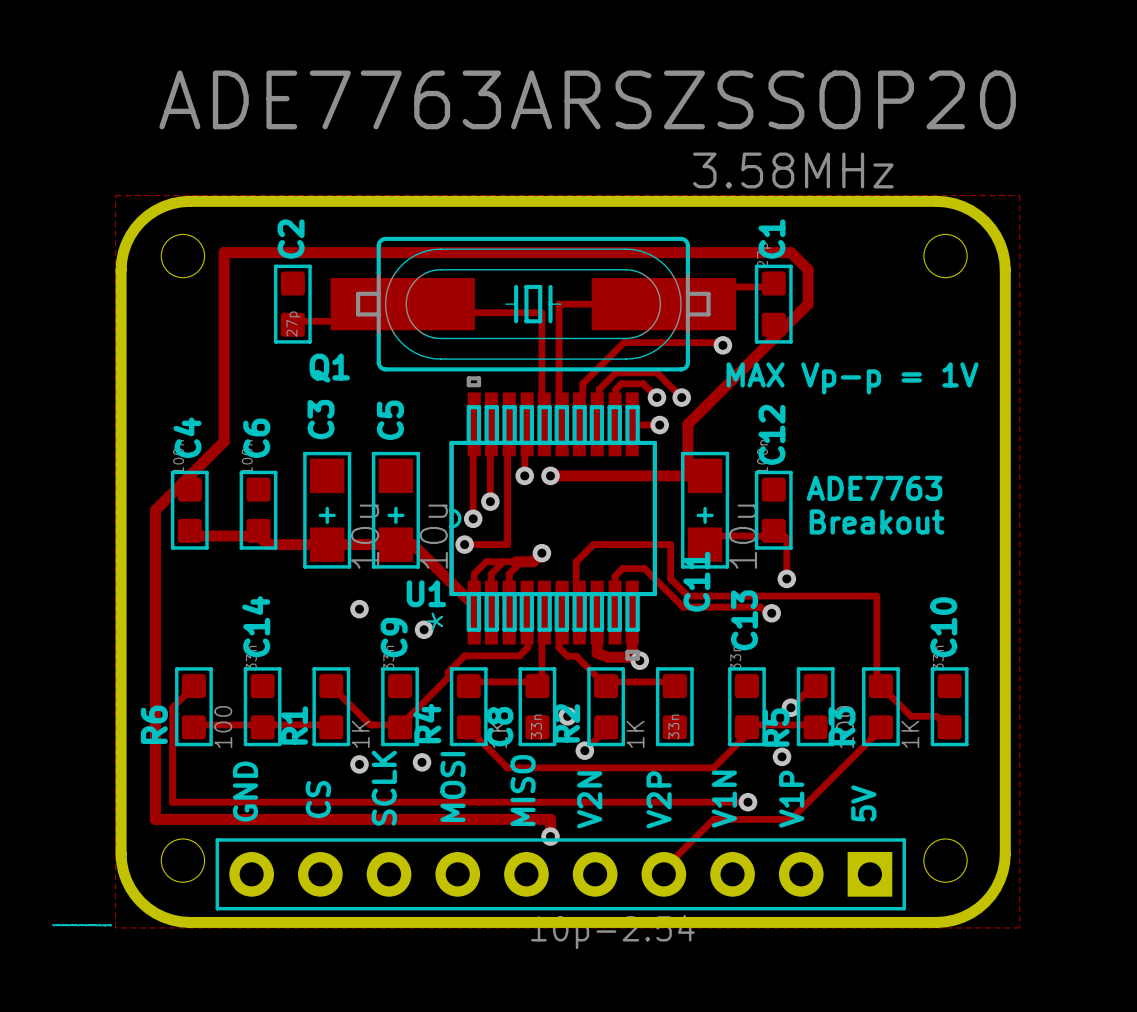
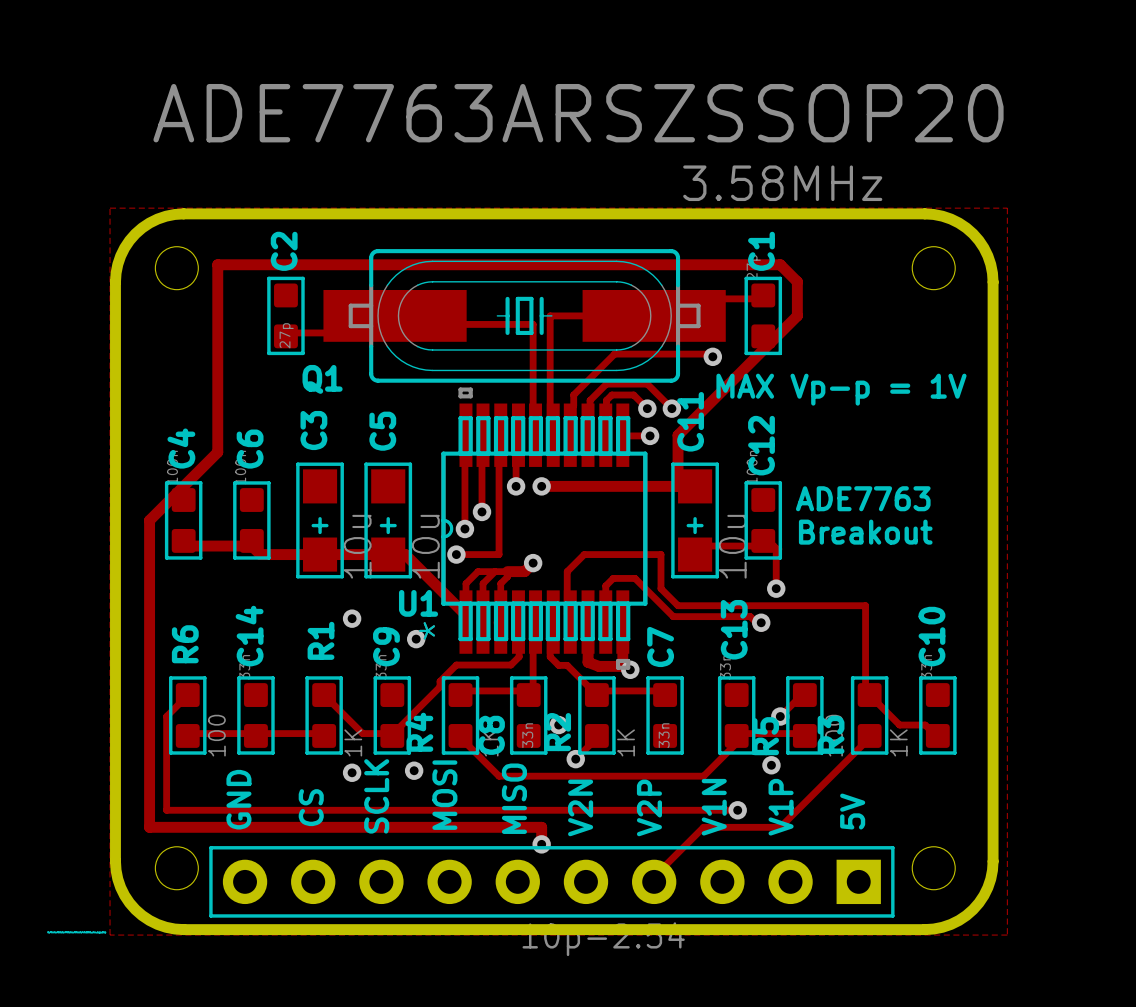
C11 name position: C11 (696, 581) -> C11 (690, 421)
C7 name: none -> C7 (660, 646)
R6 name position: R6 (154, 724) -> R6 (185, 644)
R1 name position: R1 (294, 725) -> R1 (321, 640)

